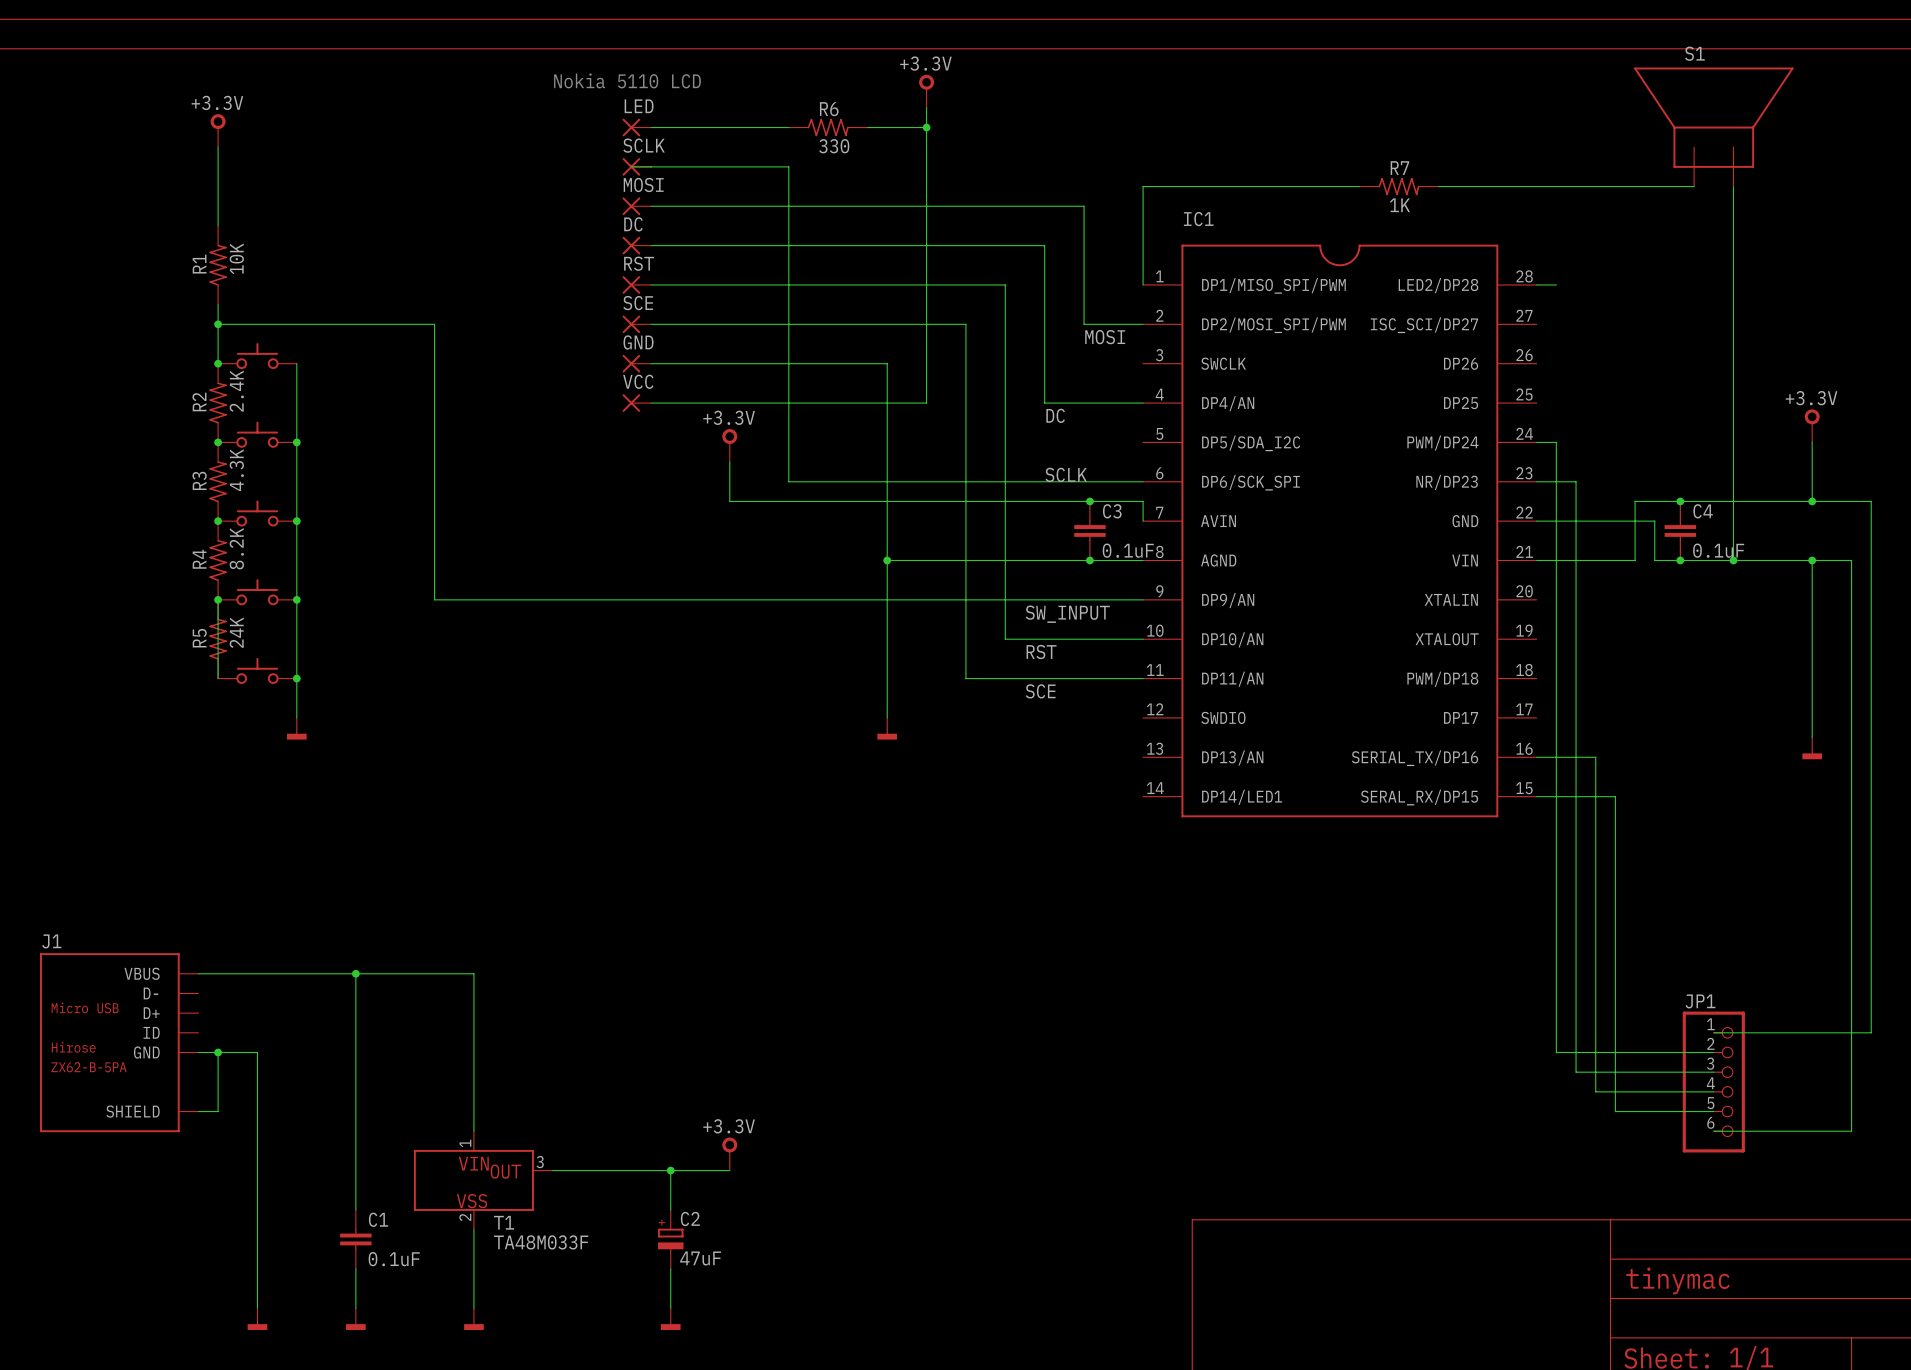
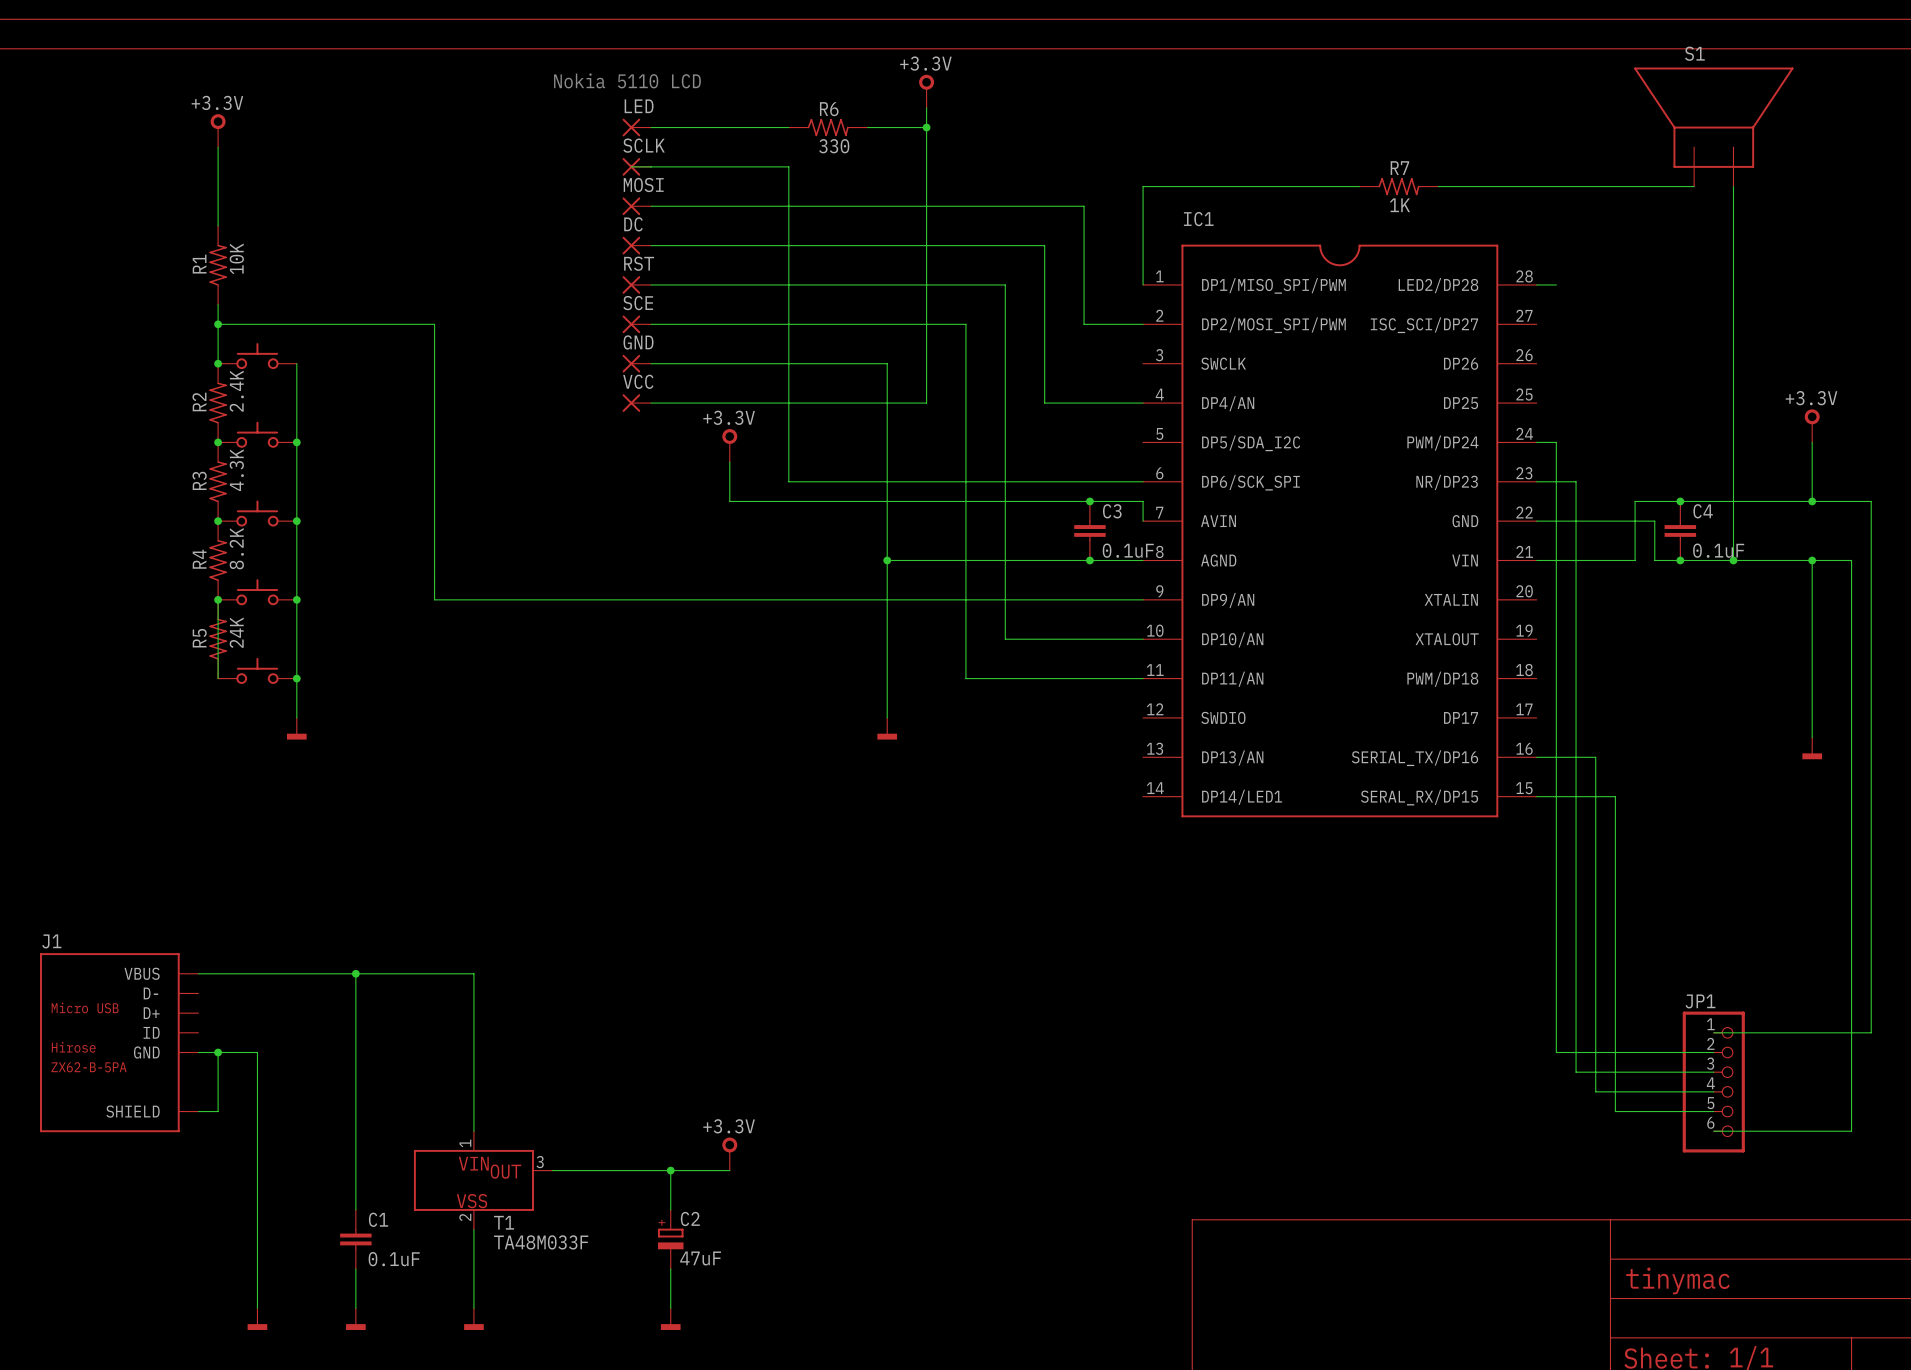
label: MOSI (1105, 337) -> none
label: DC (1055, 415) -> none
label: SCLK (1066, 474) -> none
label: SW_INPUT (1067, 614) -> none
label: RST (1041, 652) -> none
label: SCE (1040, 691) -> none

